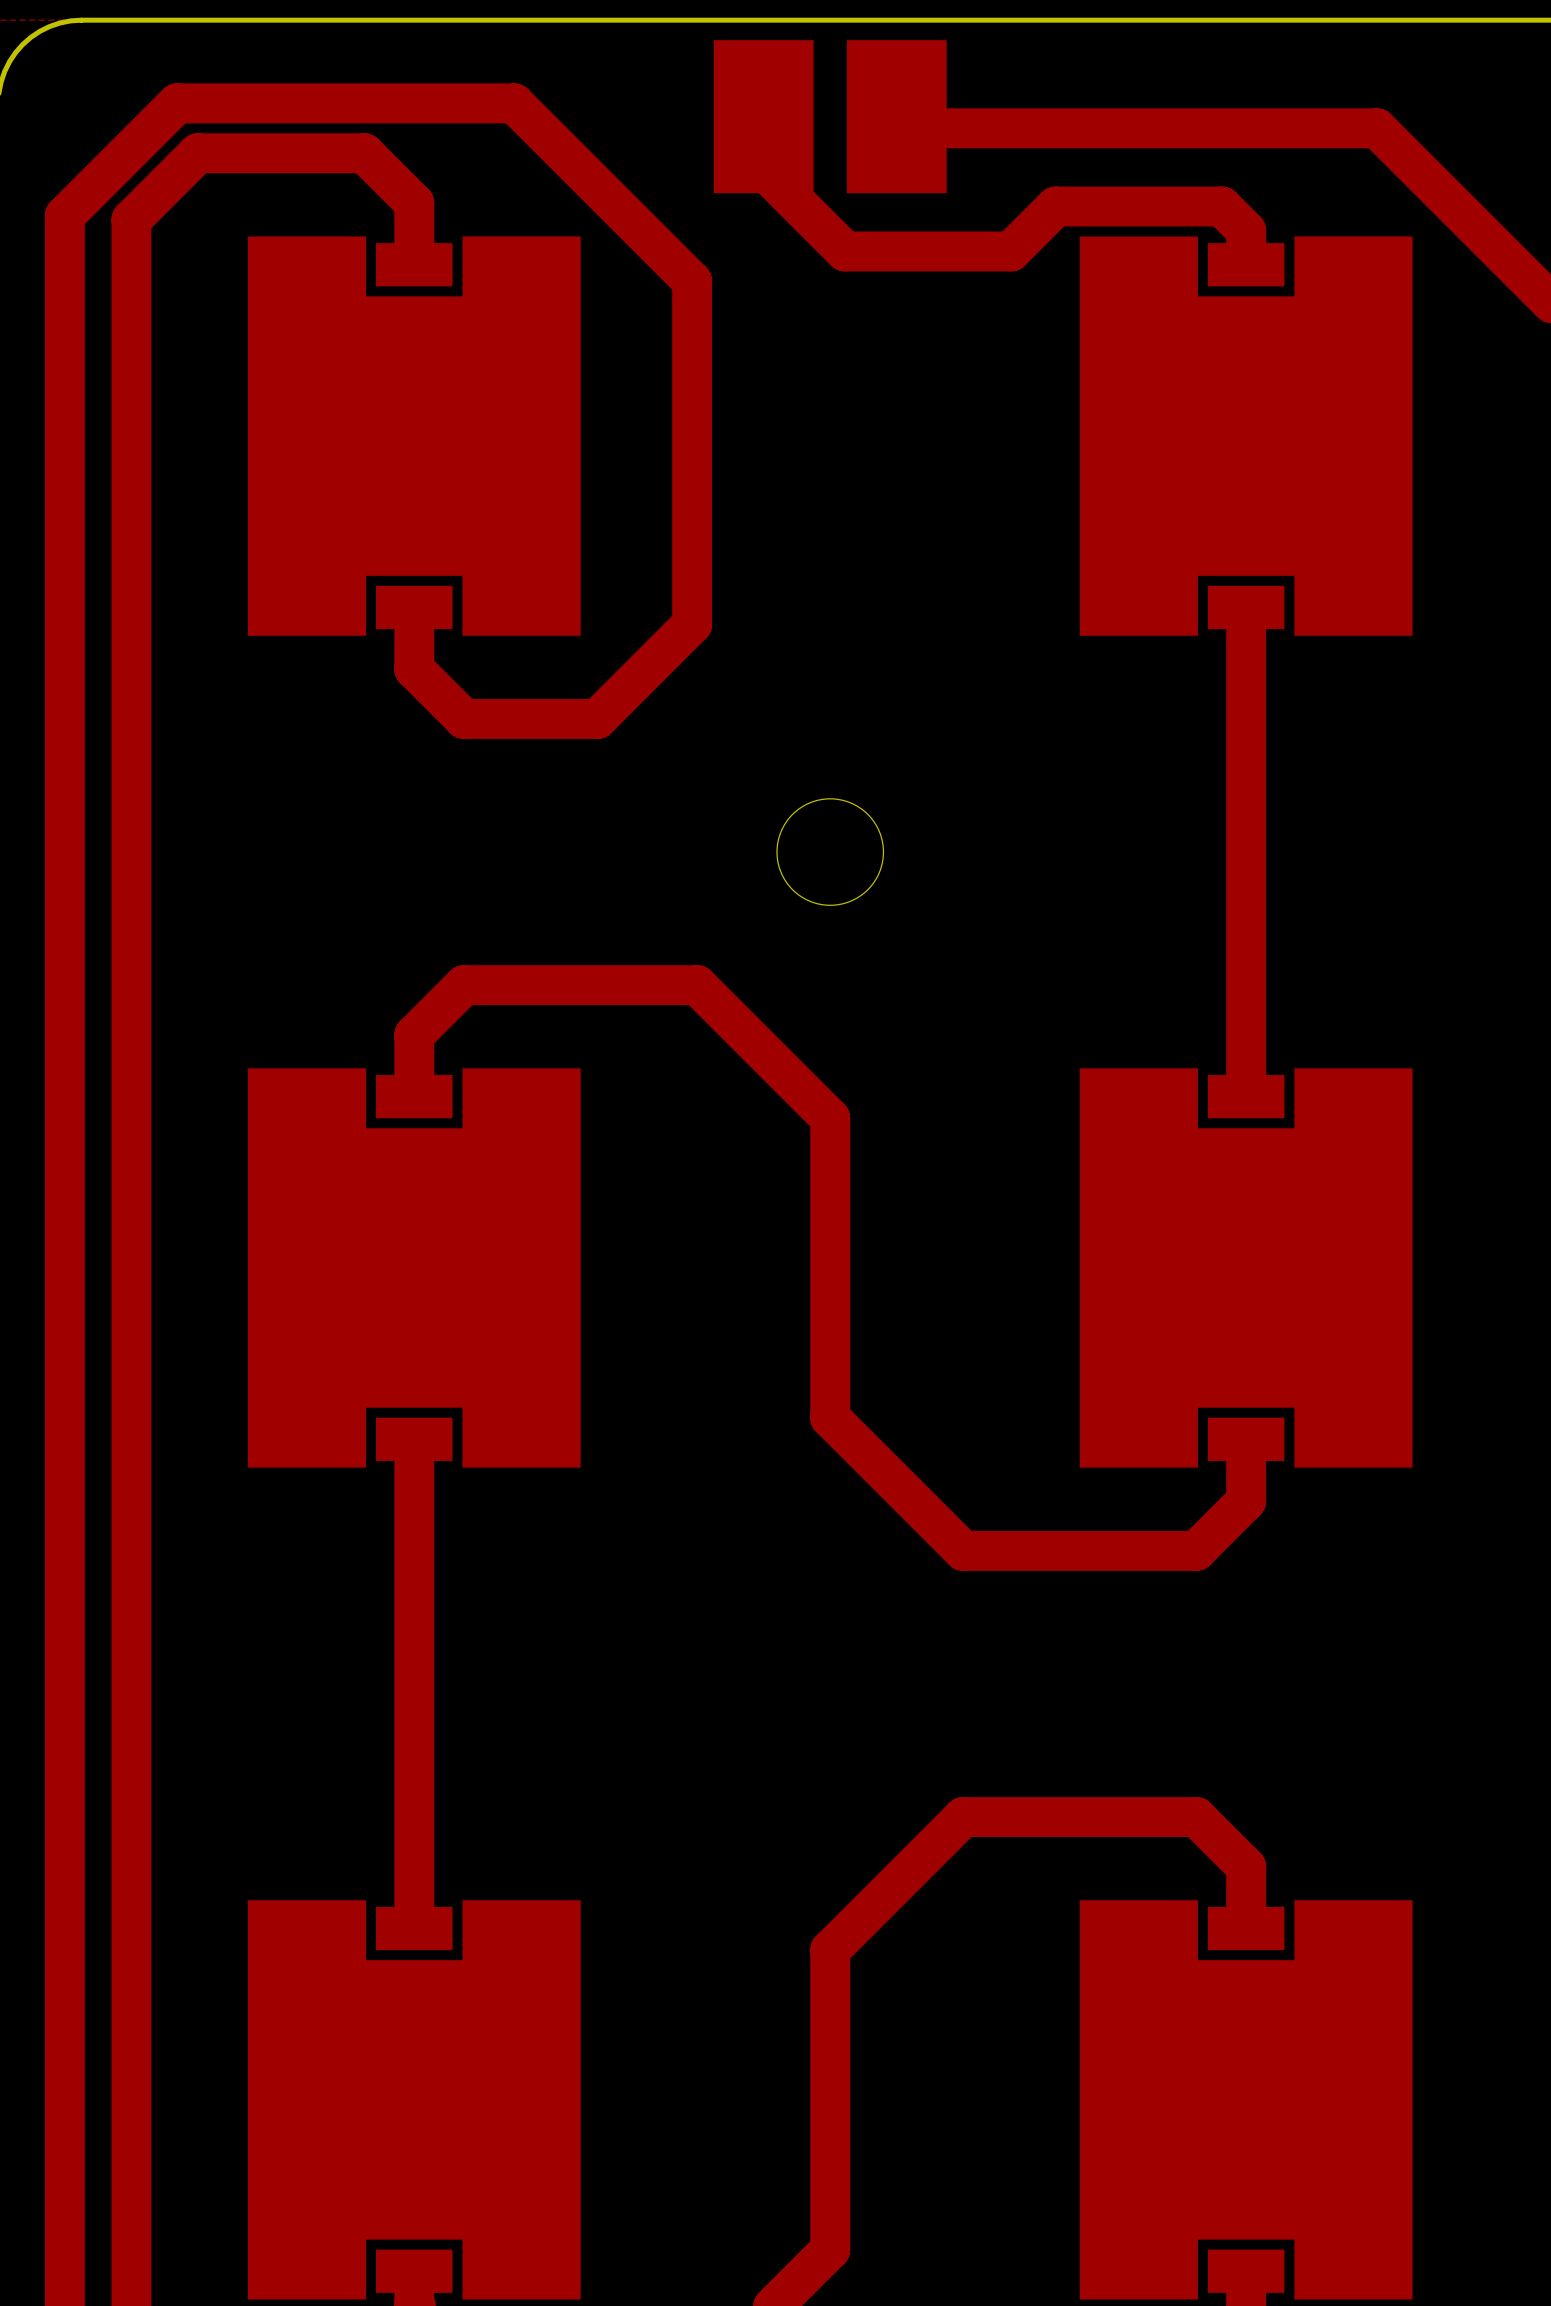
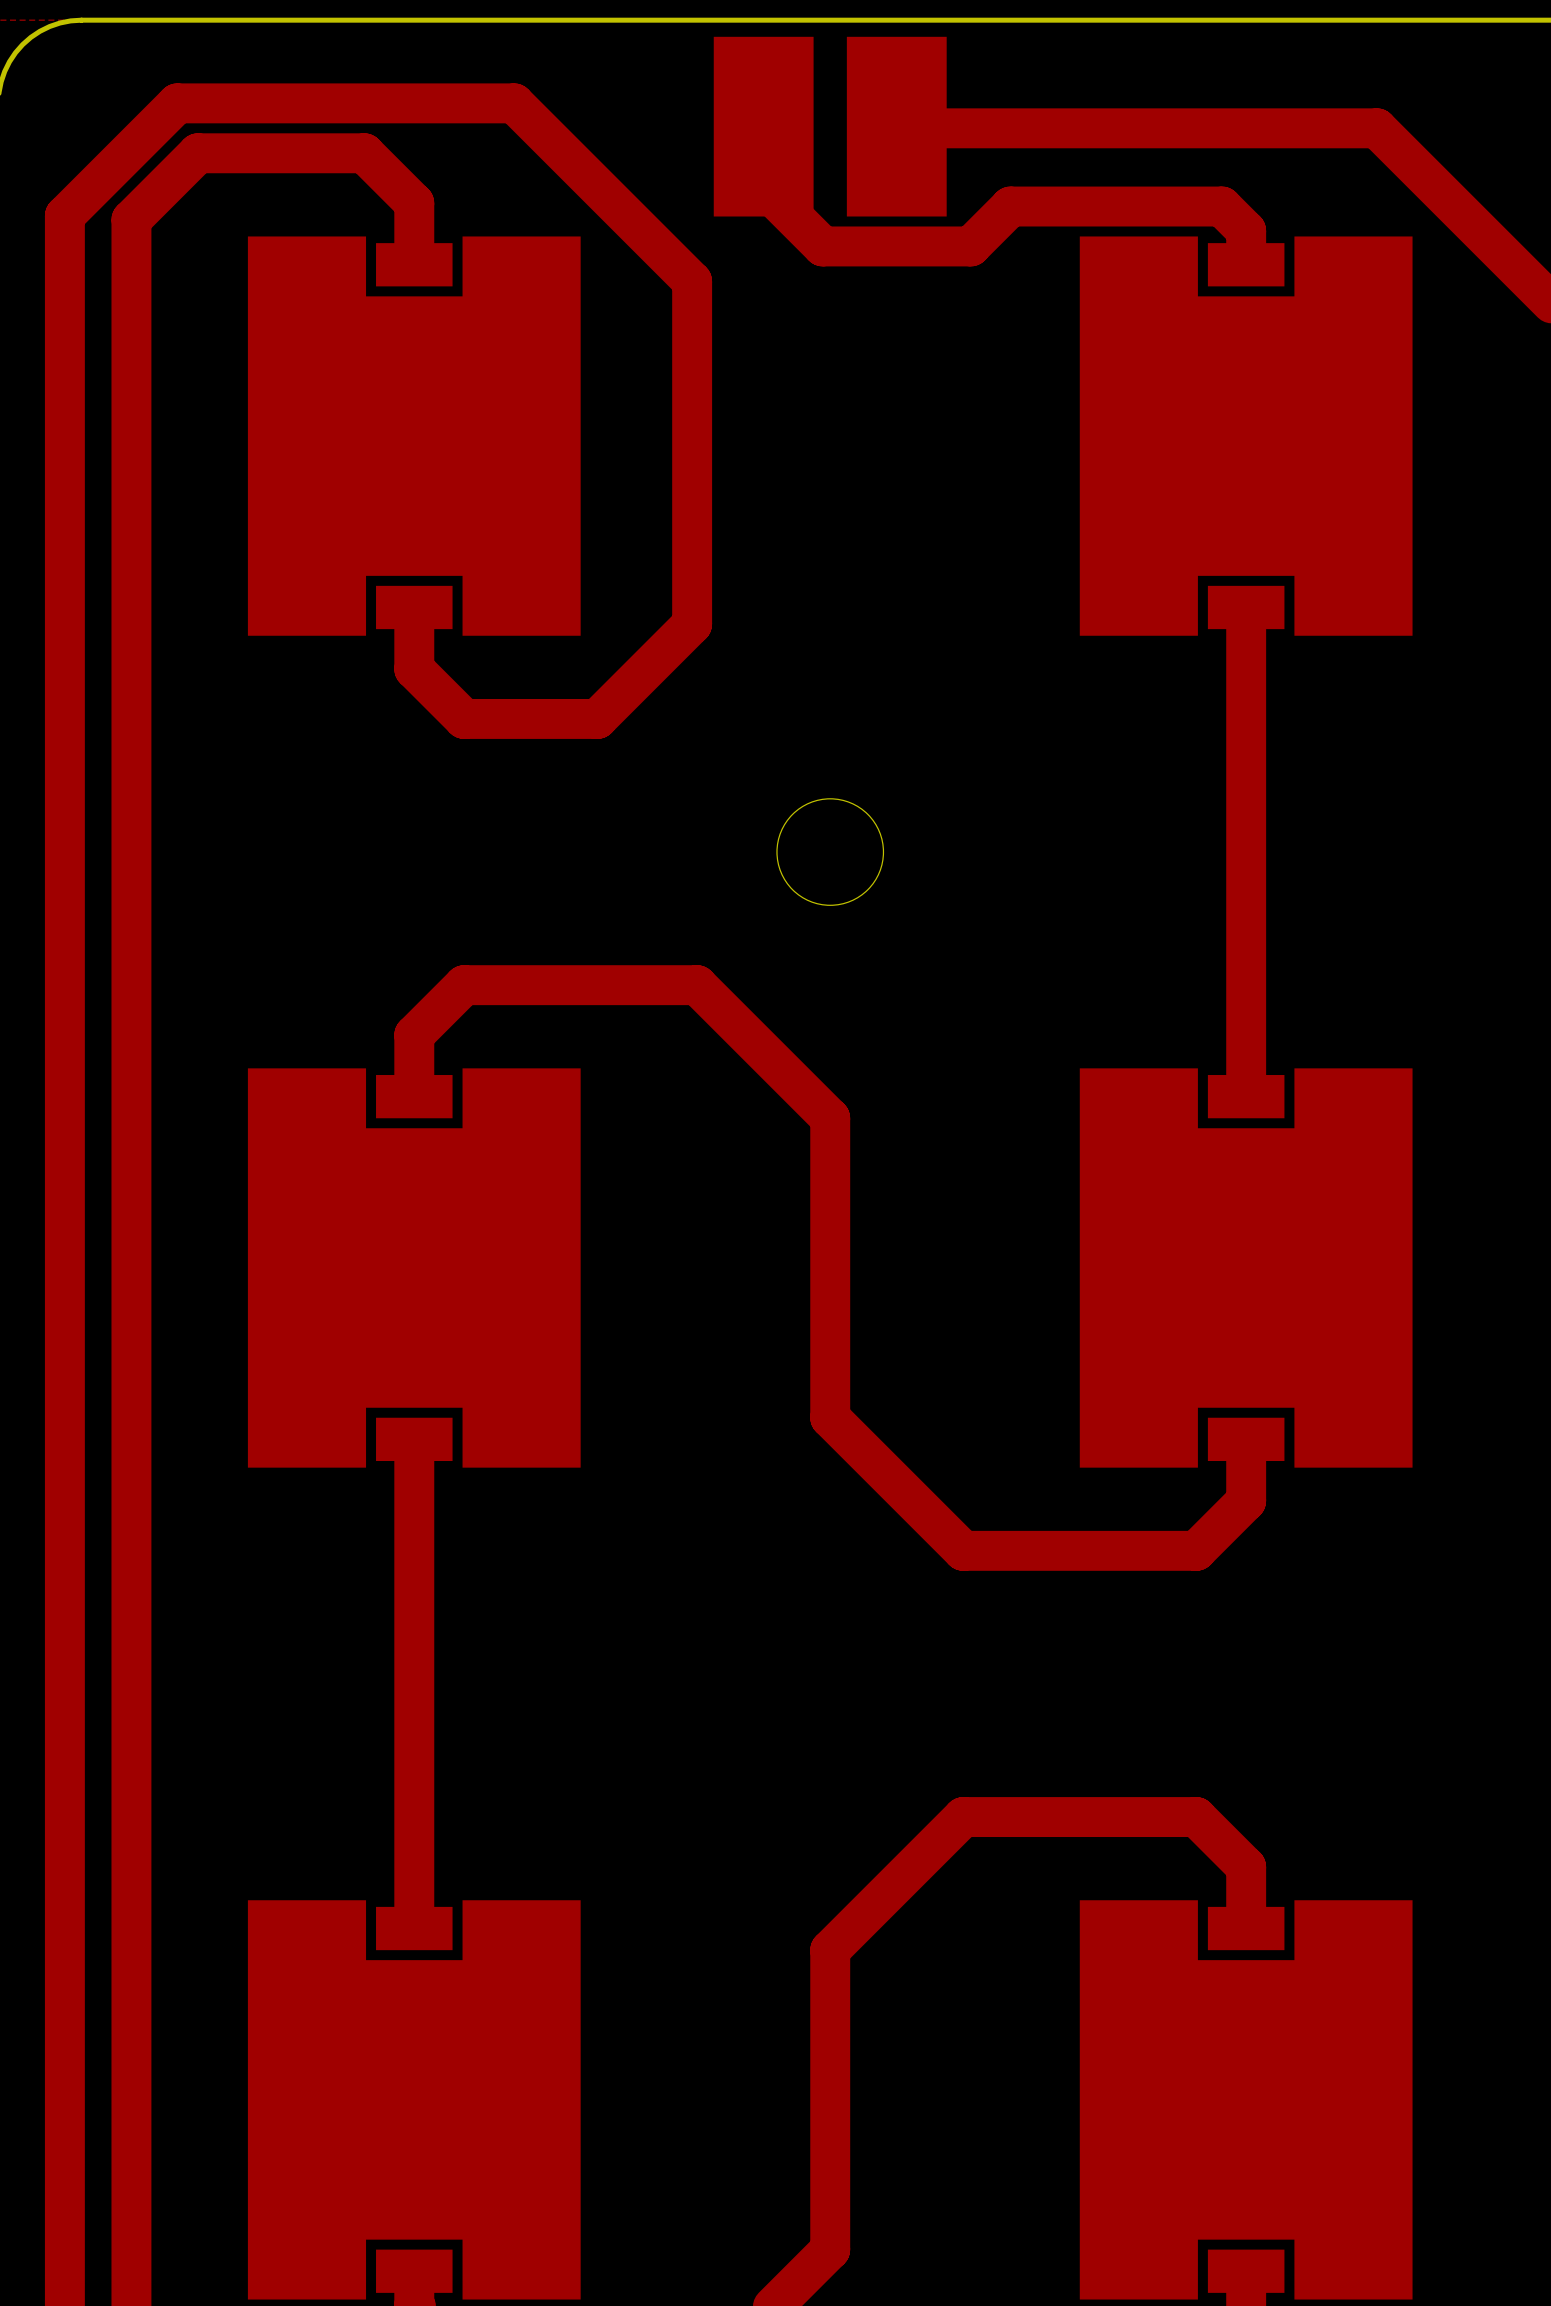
part footprint: [713, 40, 947, 194] -> [713, 36, 947, 217]
top track: (763, 169) (845, 251) (1010, 251) (1055, 206) -> (763, 169) (763, 187) (822, 246) (970, 246) (1010, 206) (1055, 206)

